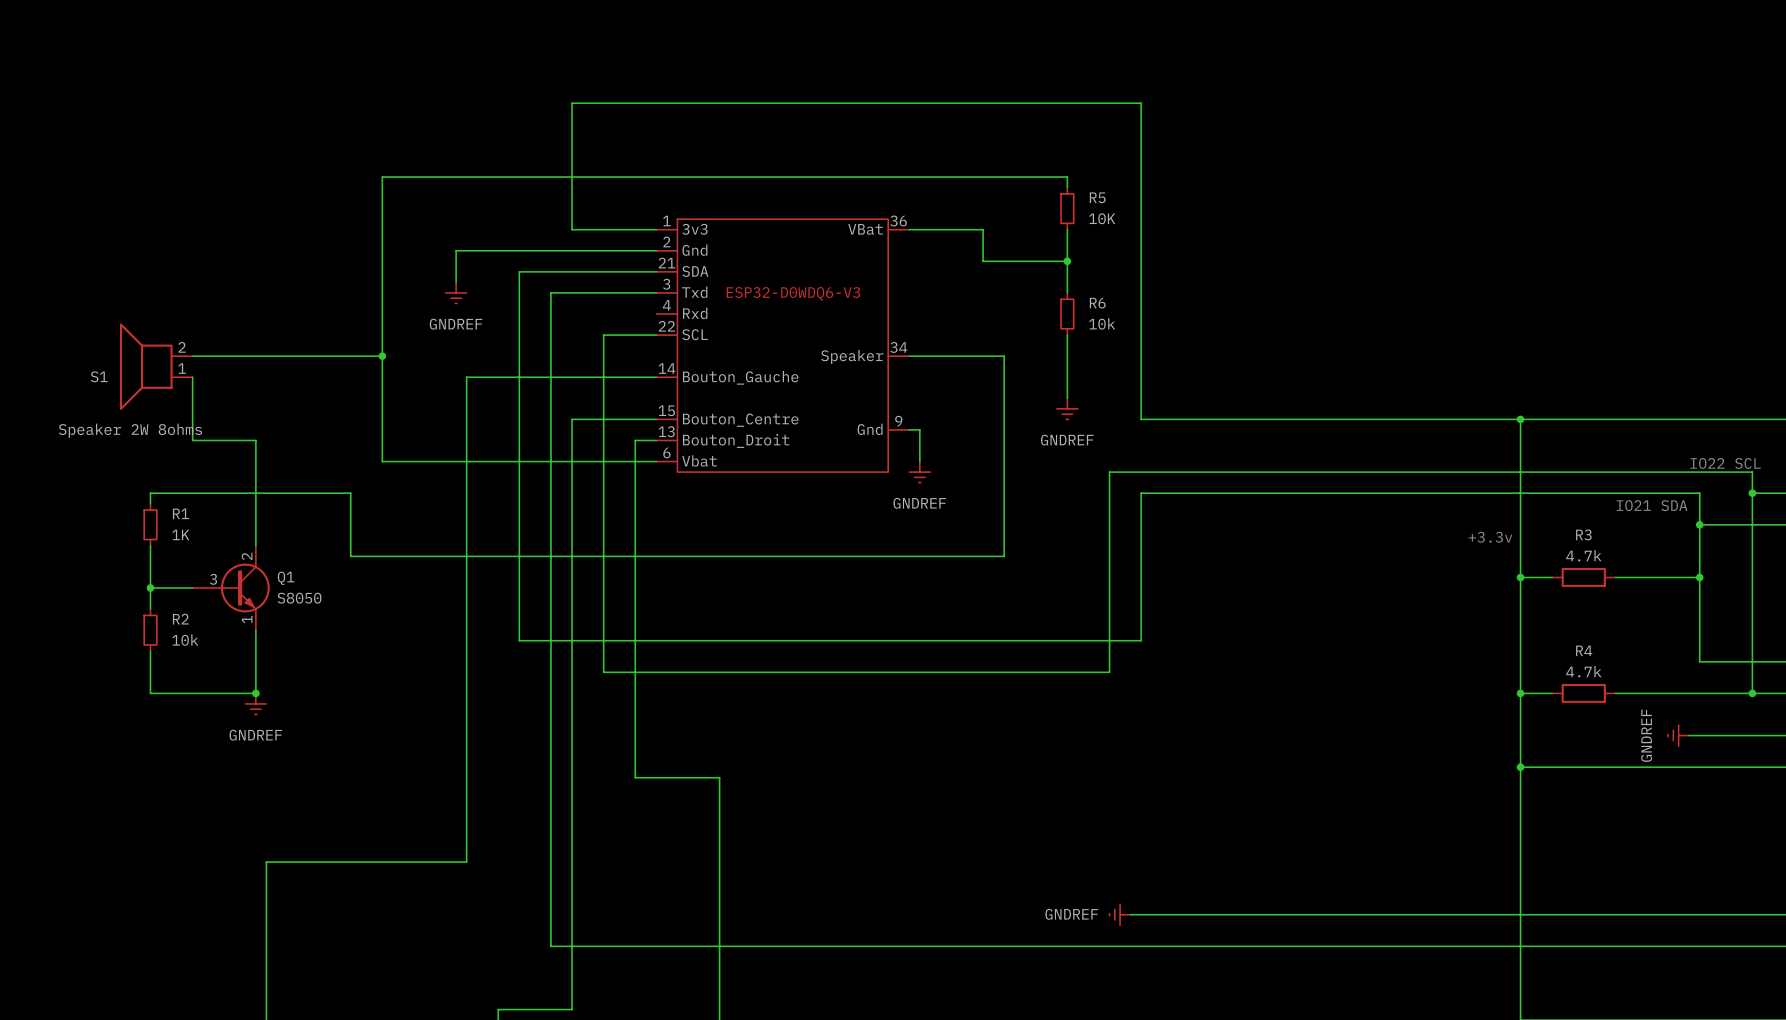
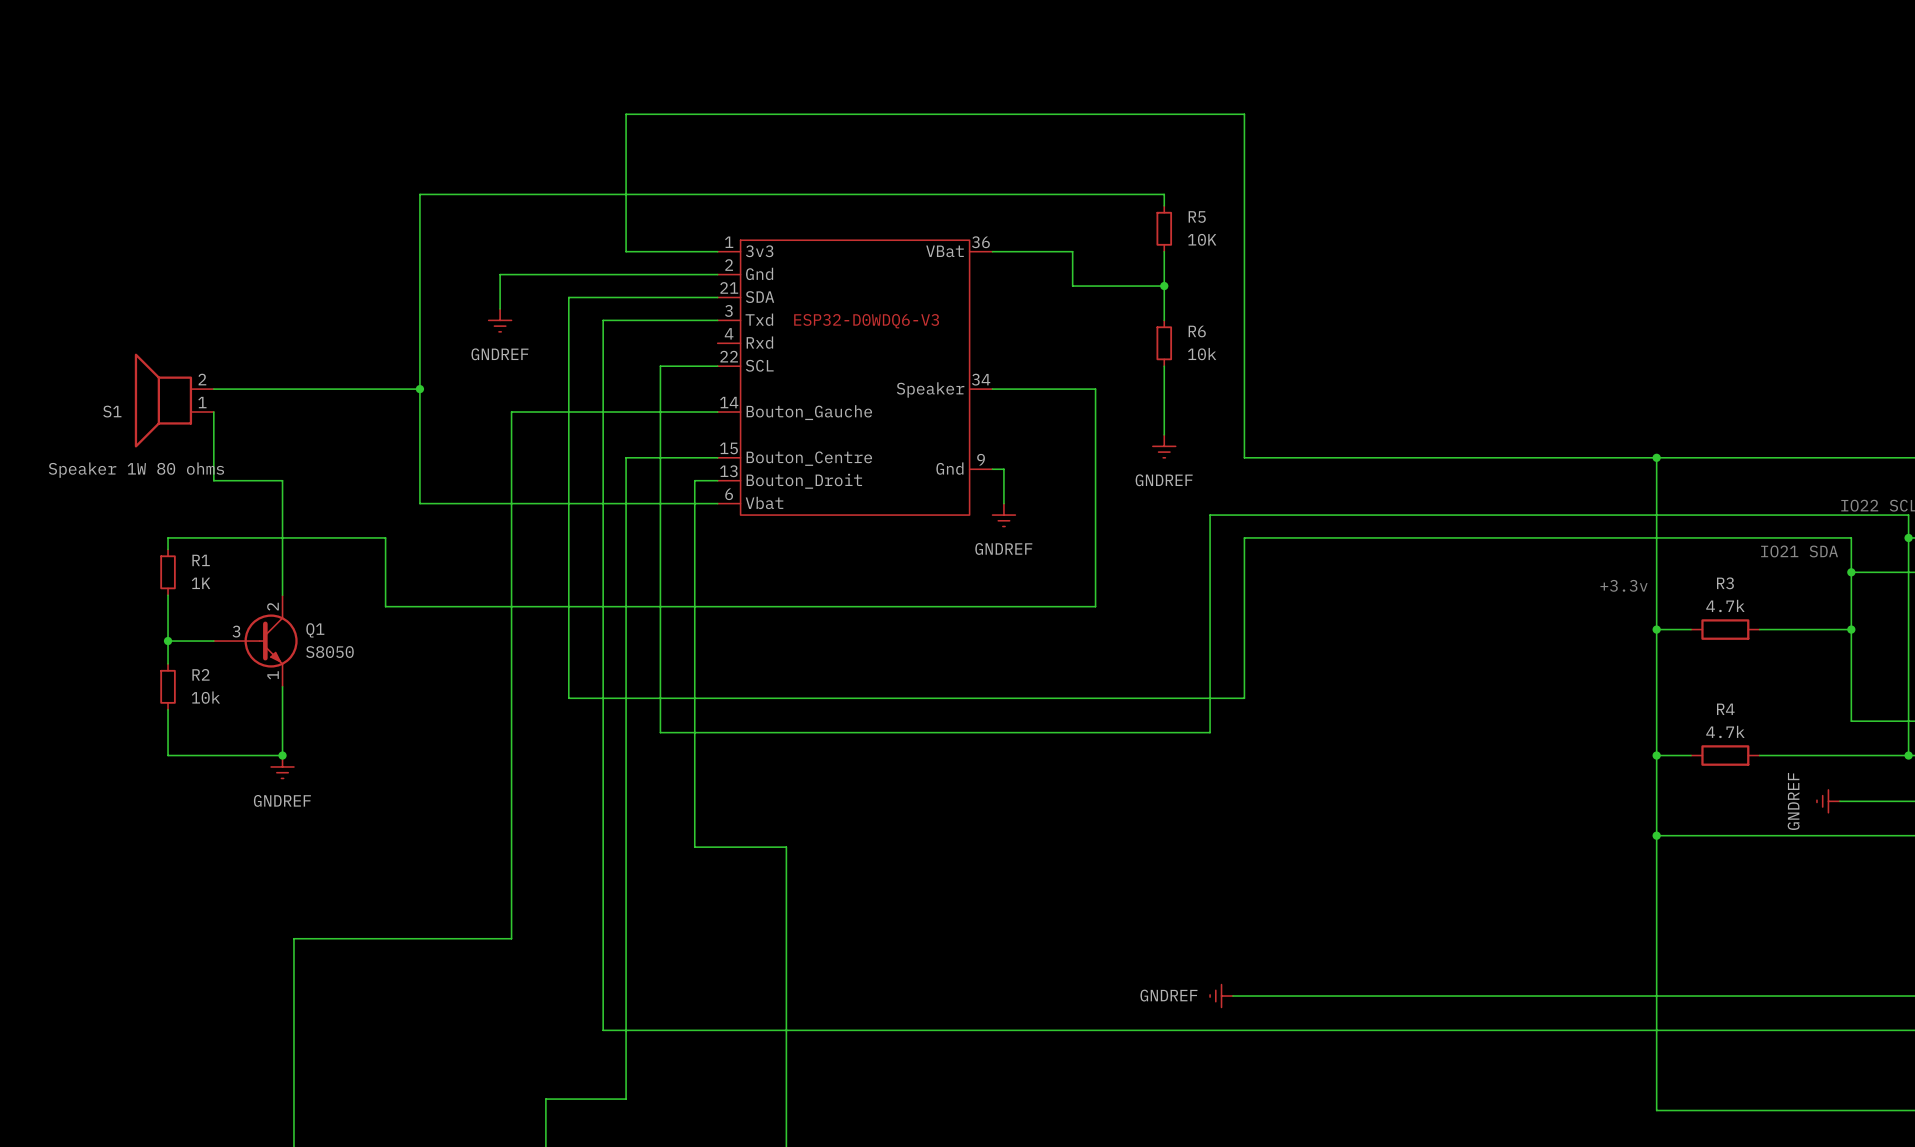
S1 value: Speaker 2W 8ohms (130, 430) -> Speaker 1W 80 ohms (136, 470)

